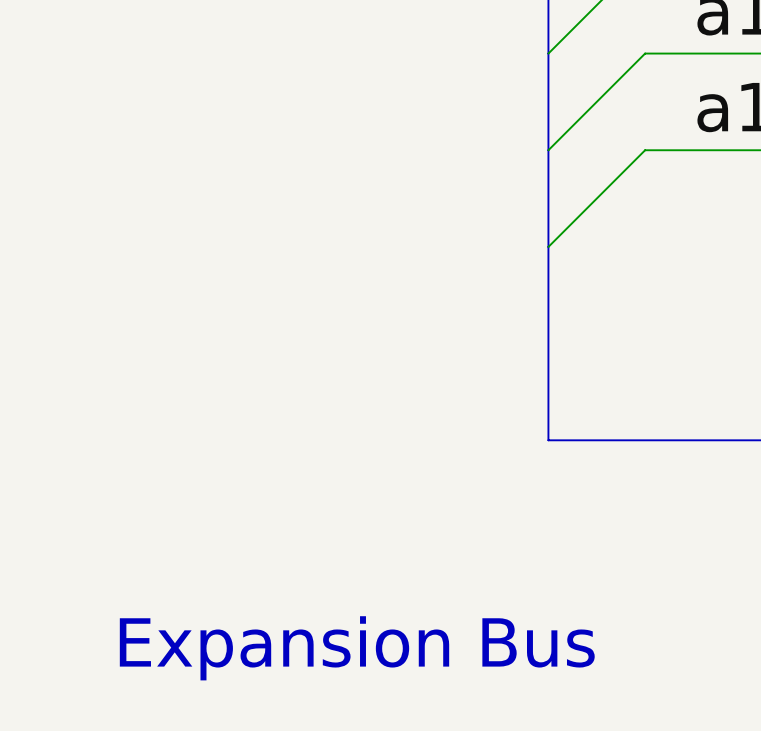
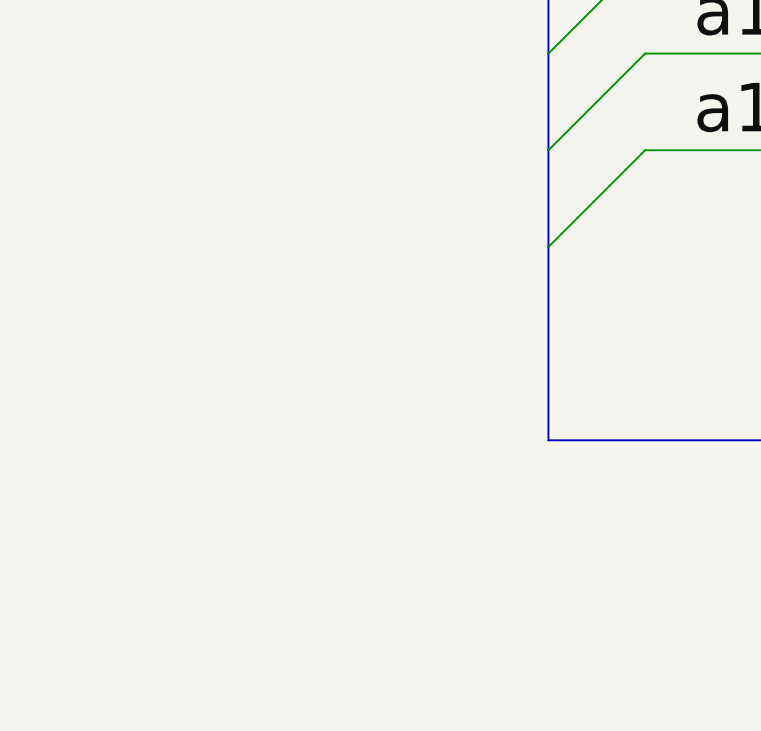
text: Expansion Bus (357, 648) -> none

